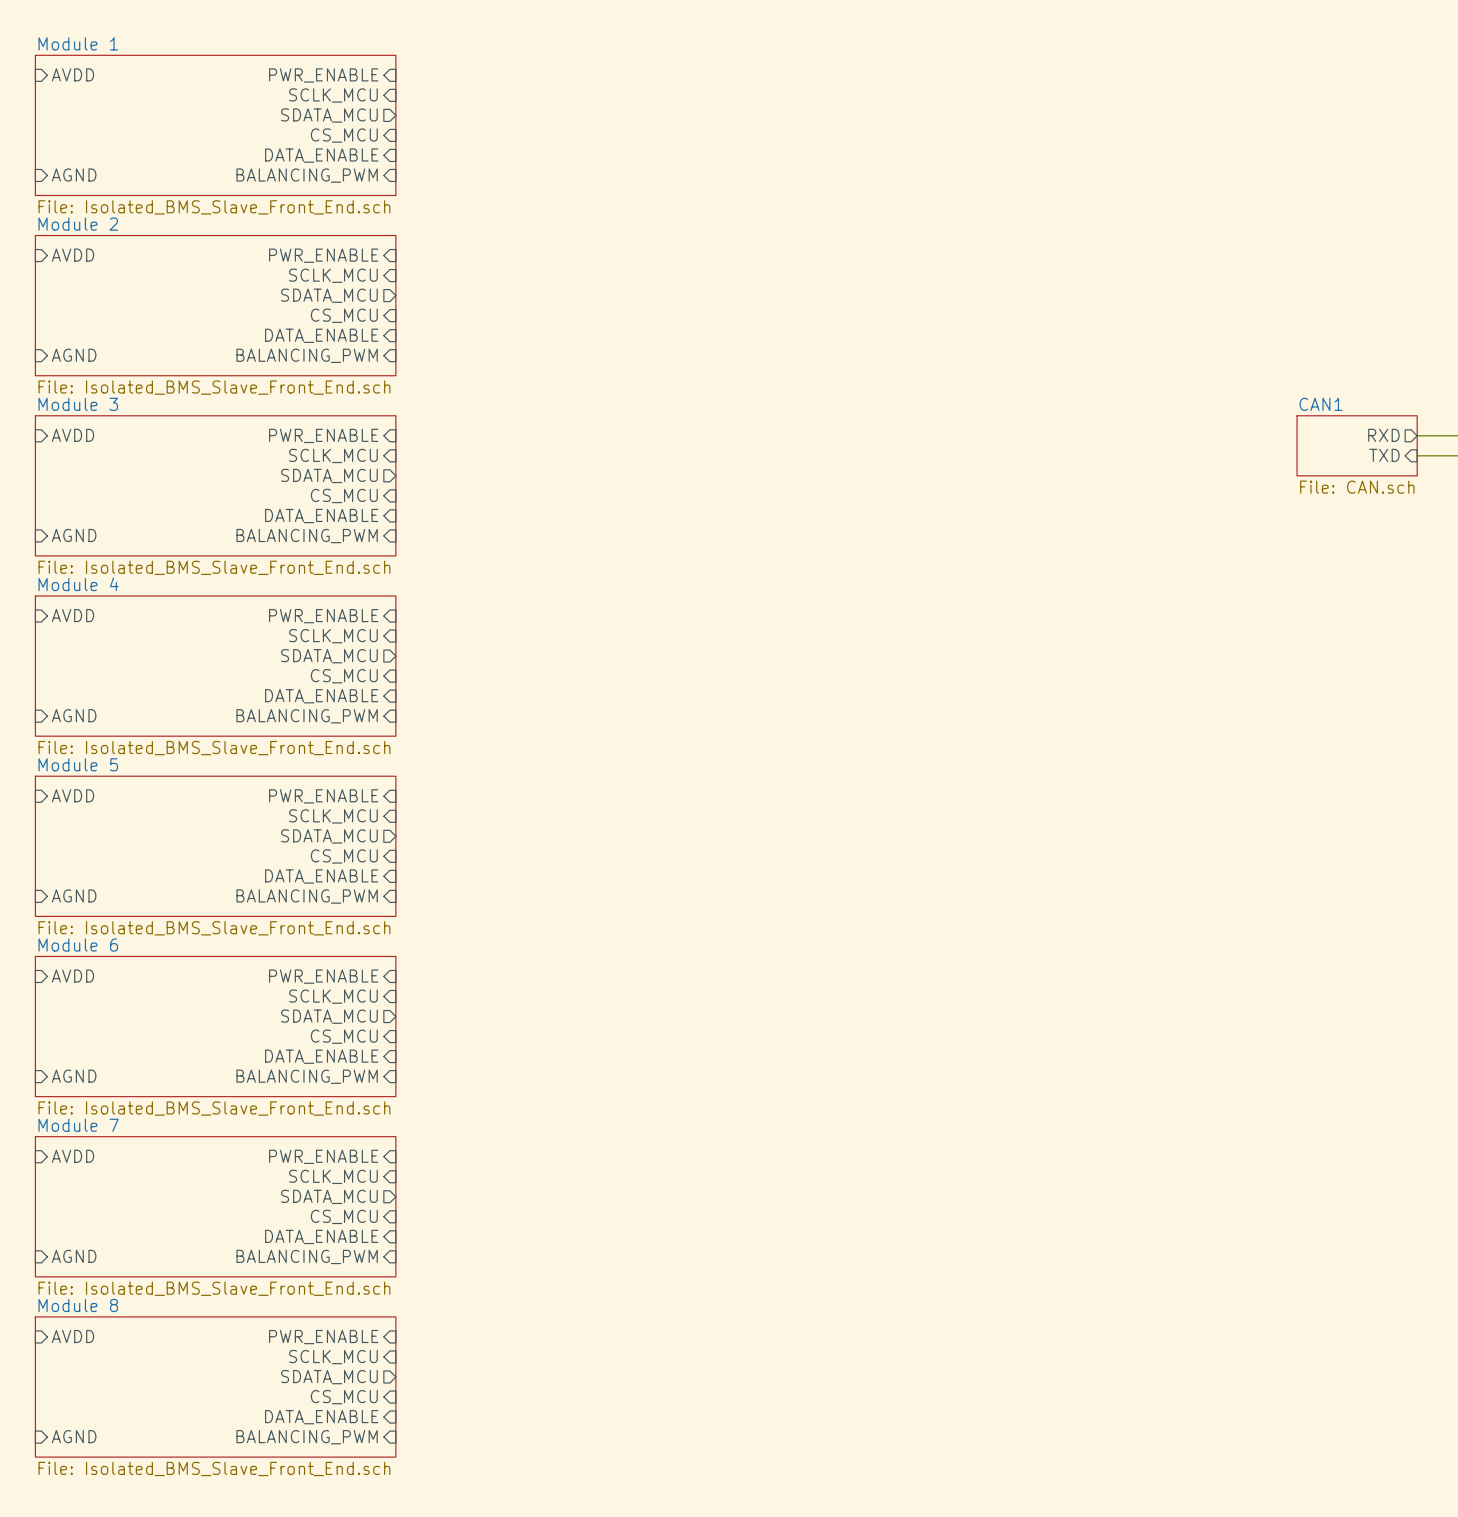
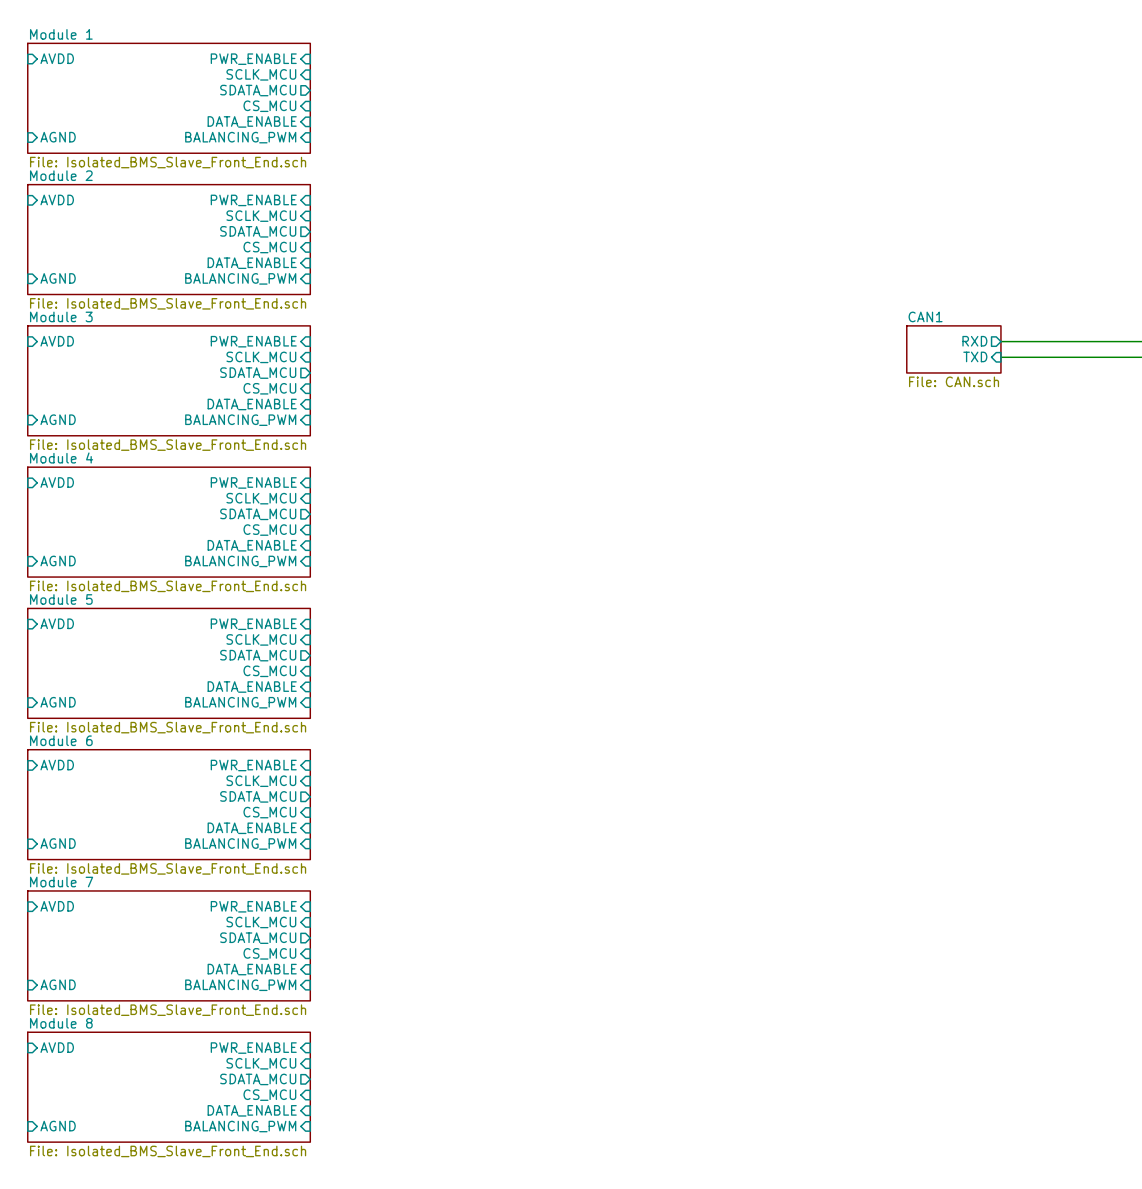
wire: none -> (1000, 341) (1110, 341)
sheet pin position: RXD (1383, 435) -> RXD (974, 341)
sheet CAN1 position: (1357, 445) -> (953, 349)
wire: none -> (1000, 357) (1110, 357)
sheet pin position: TXD (1384, 455) -> TXD (975, 356)

